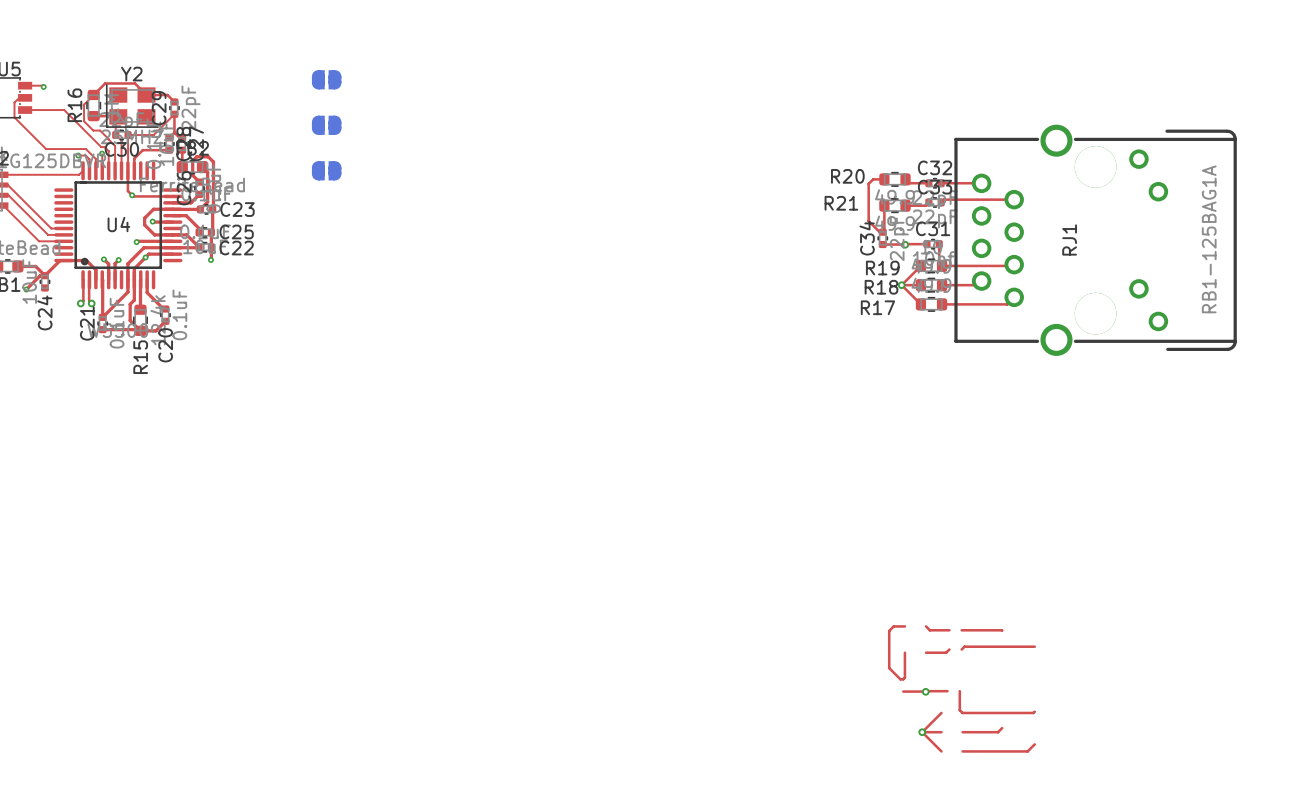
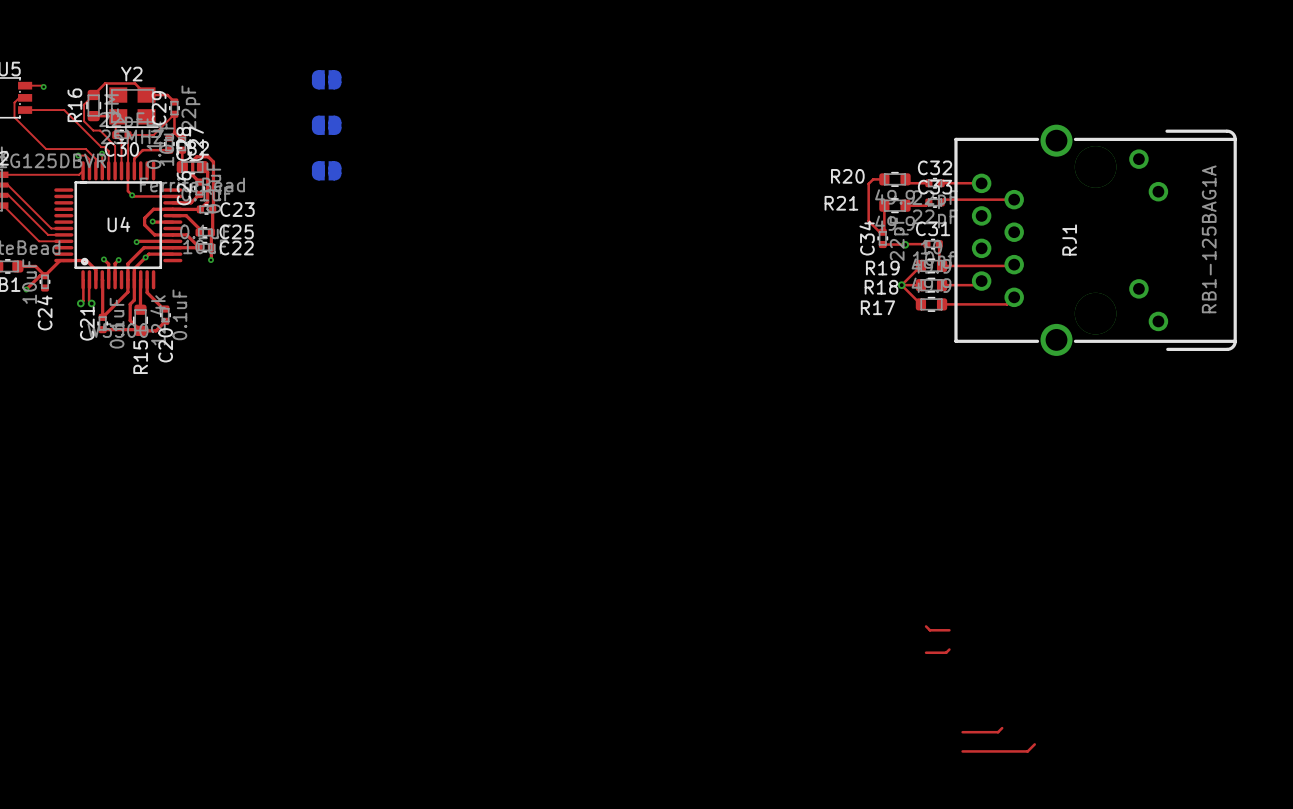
top track: (904, 626) (893, 626) (889, 630) (889, 668) (900, 679) (904, 677) (904, 652) -> none
top track: (961, 630) (1002, 630) -> none
top track: (1034, 646) (964, 646) (961, 649) -> none
via: (925, 691) -> none
top track: (947, 691) (903, 691) -> none
top track: (959, 691) (959, 710) (962, 712) (1034, 711) -> none
top track: (941, 712) (922, 732) -> none
top track: (922, 732) (941, 732) -> none
top track: (922, 732) (941, 751) -> none
via: (922, 732) -> none

